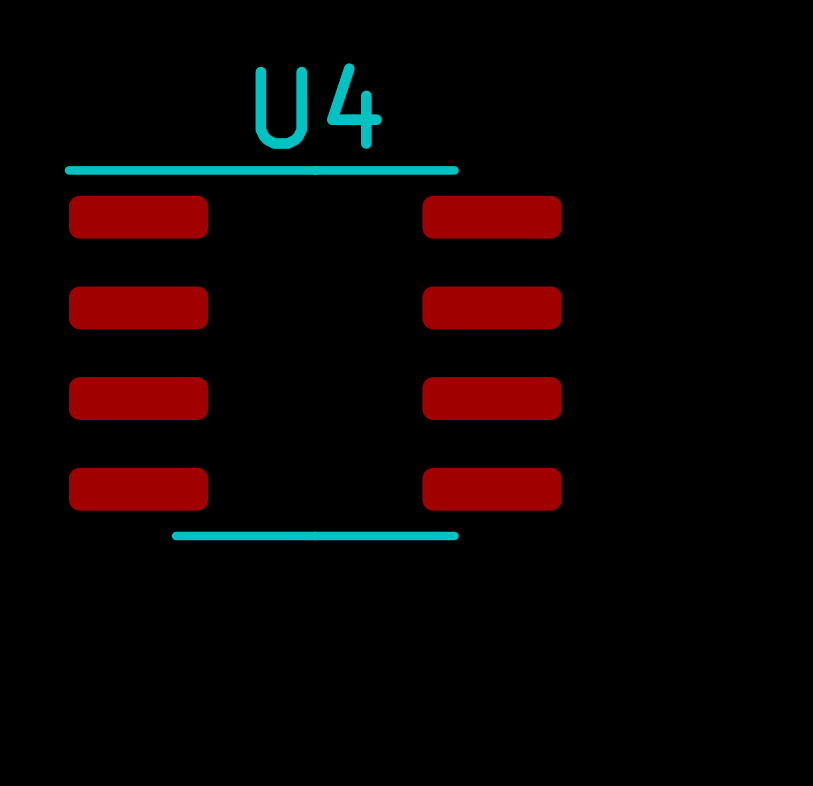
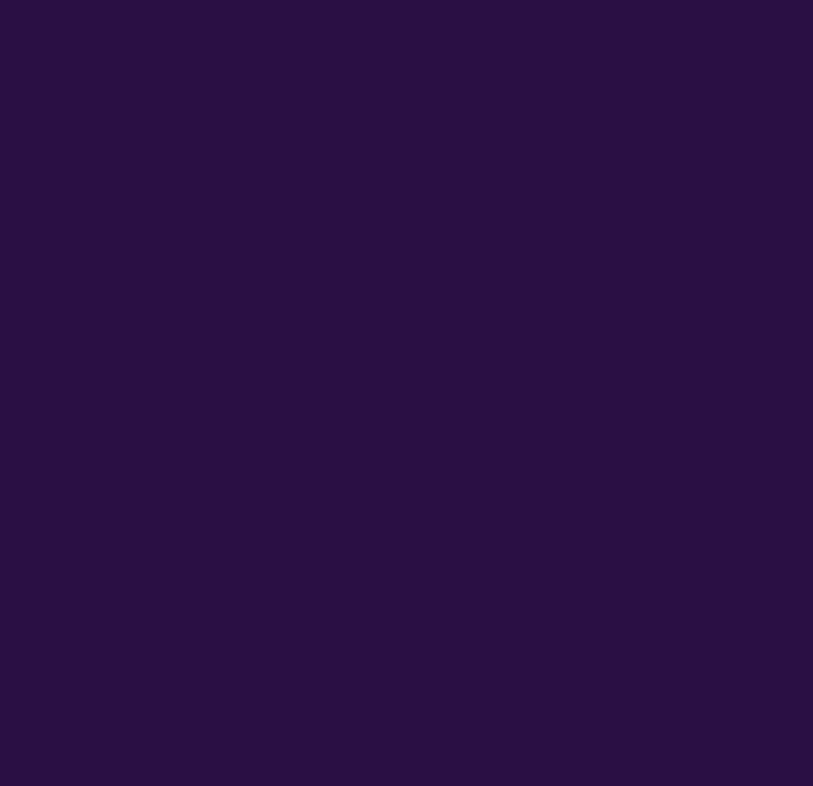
U4: (313, 353) -> none

